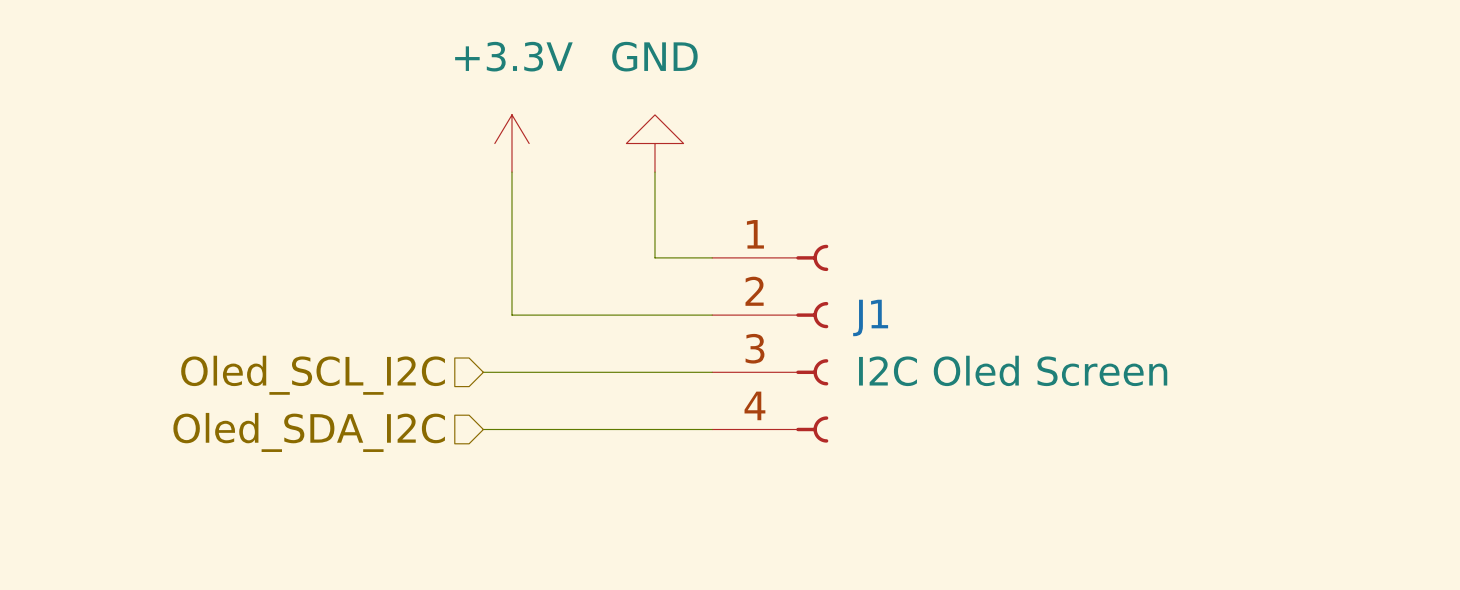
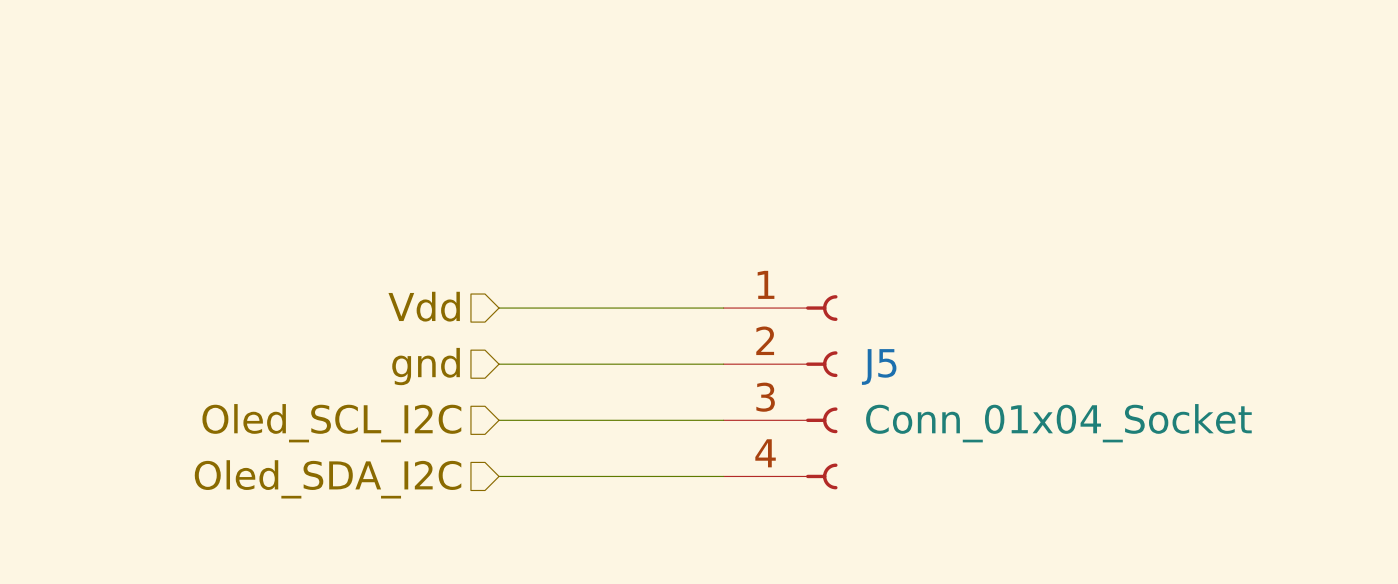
power symbol: +3.3V (511, 143) -> none
power symbol: GND (654, 143) -> none
wire: (511, 172) (511, 315) -> (499, 364) (527, 364)
wire: (654, 172) (654, 257) -> (499, 308) (667, 308)
hierarchical label: none -> Vdd (424, 306)
hierarchical label: none -> gnd (426, 366)
J1 name: J1 (870, 317) -> J5 (879, 366)
J1 value: I2C Oled Screen (1013, 370) -> Conn_01x04_Socket (1058, 423)

